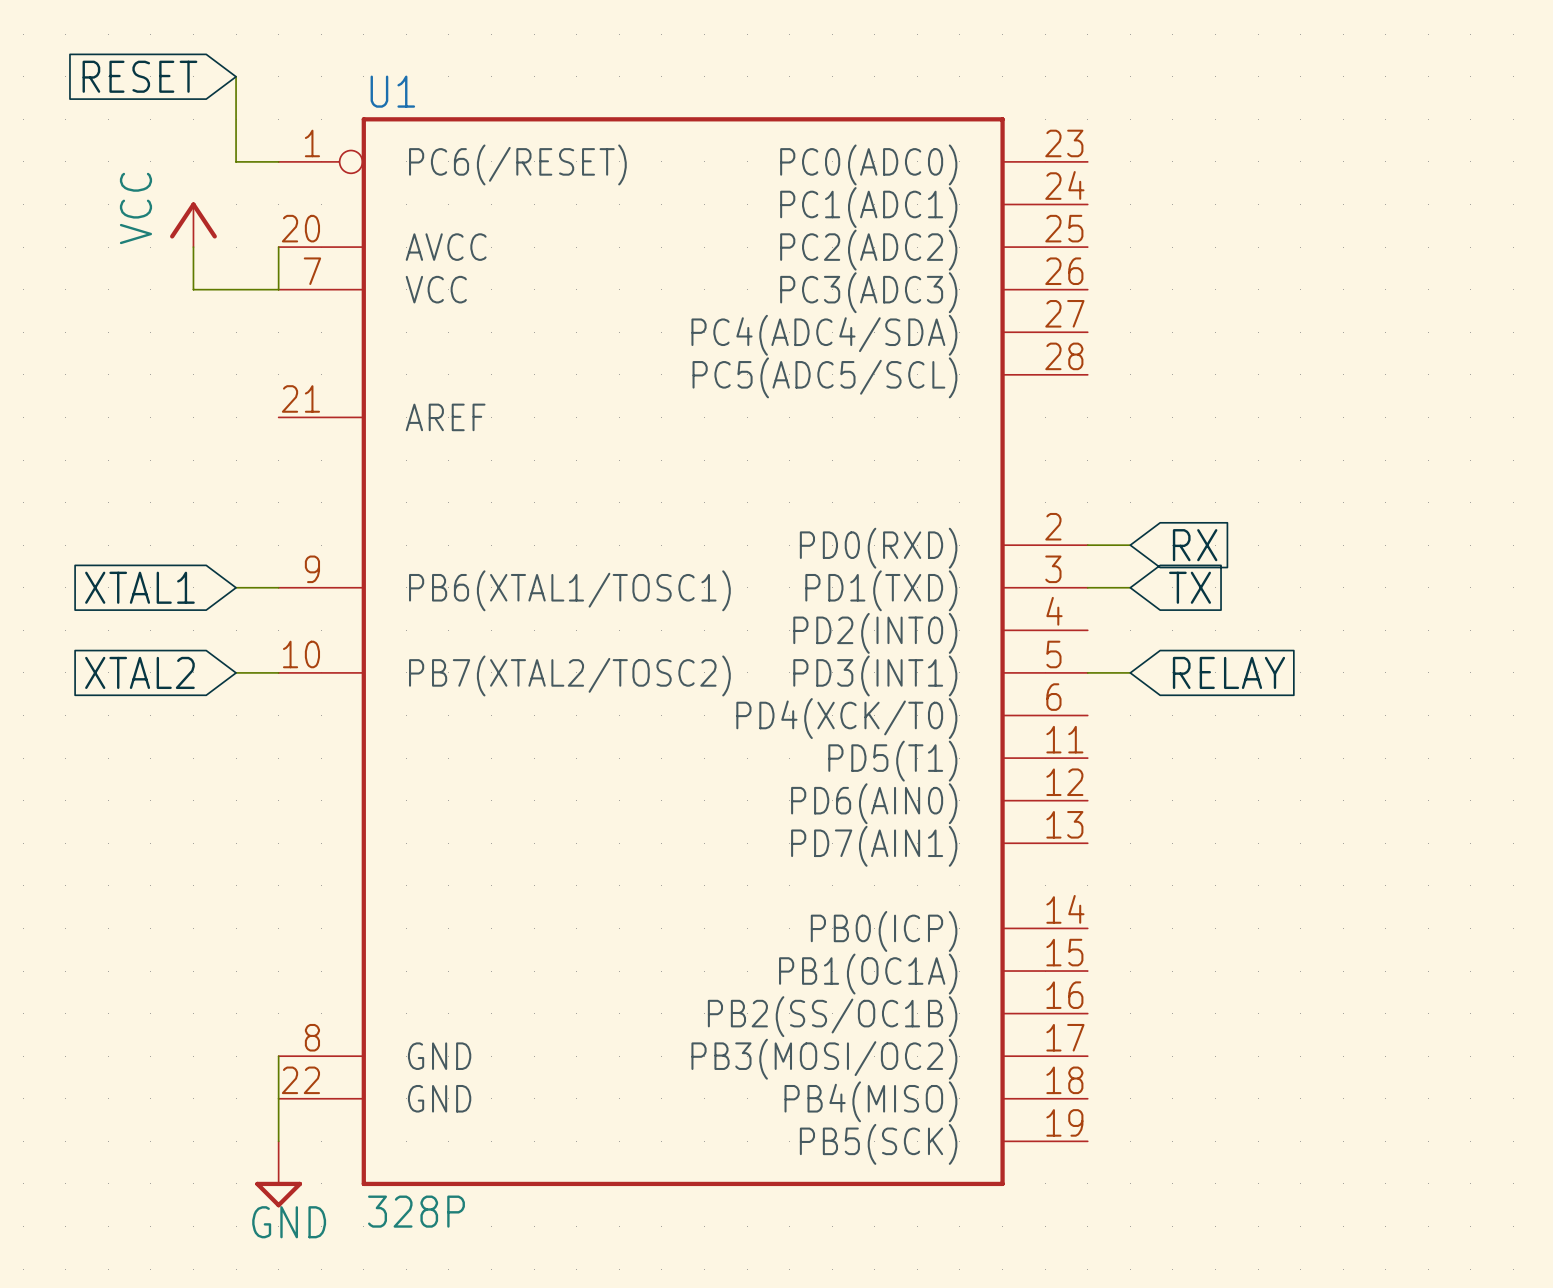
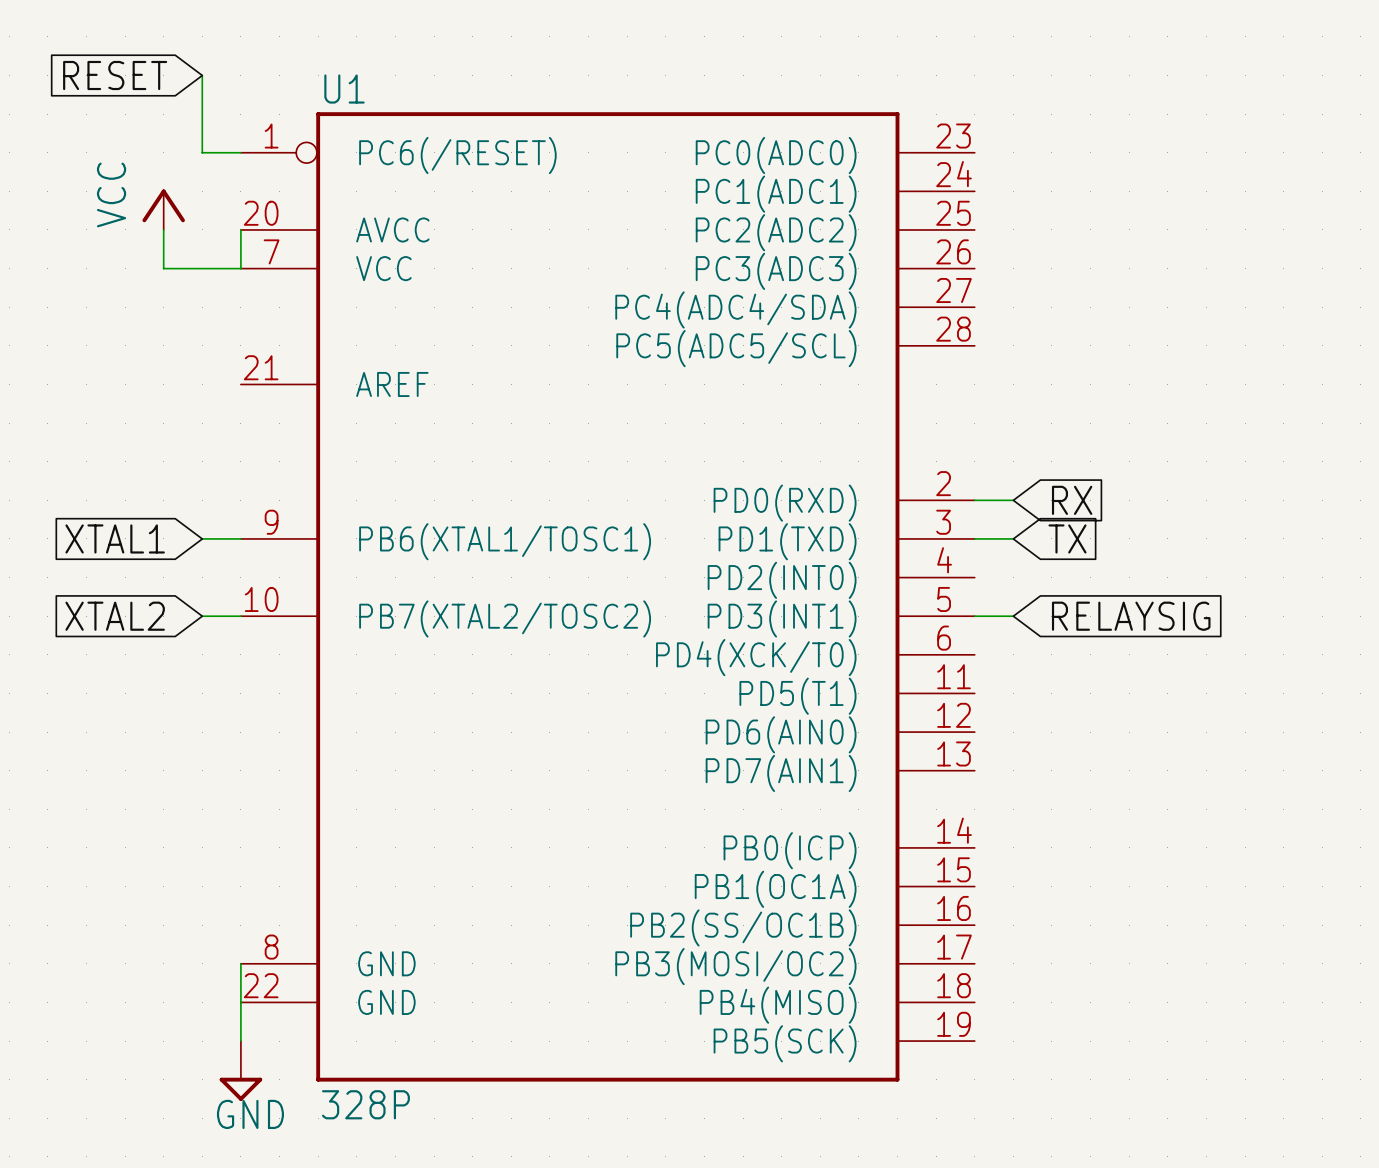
global label: RELAY (1228, 672) -> RELAYSIG (1131, 616)

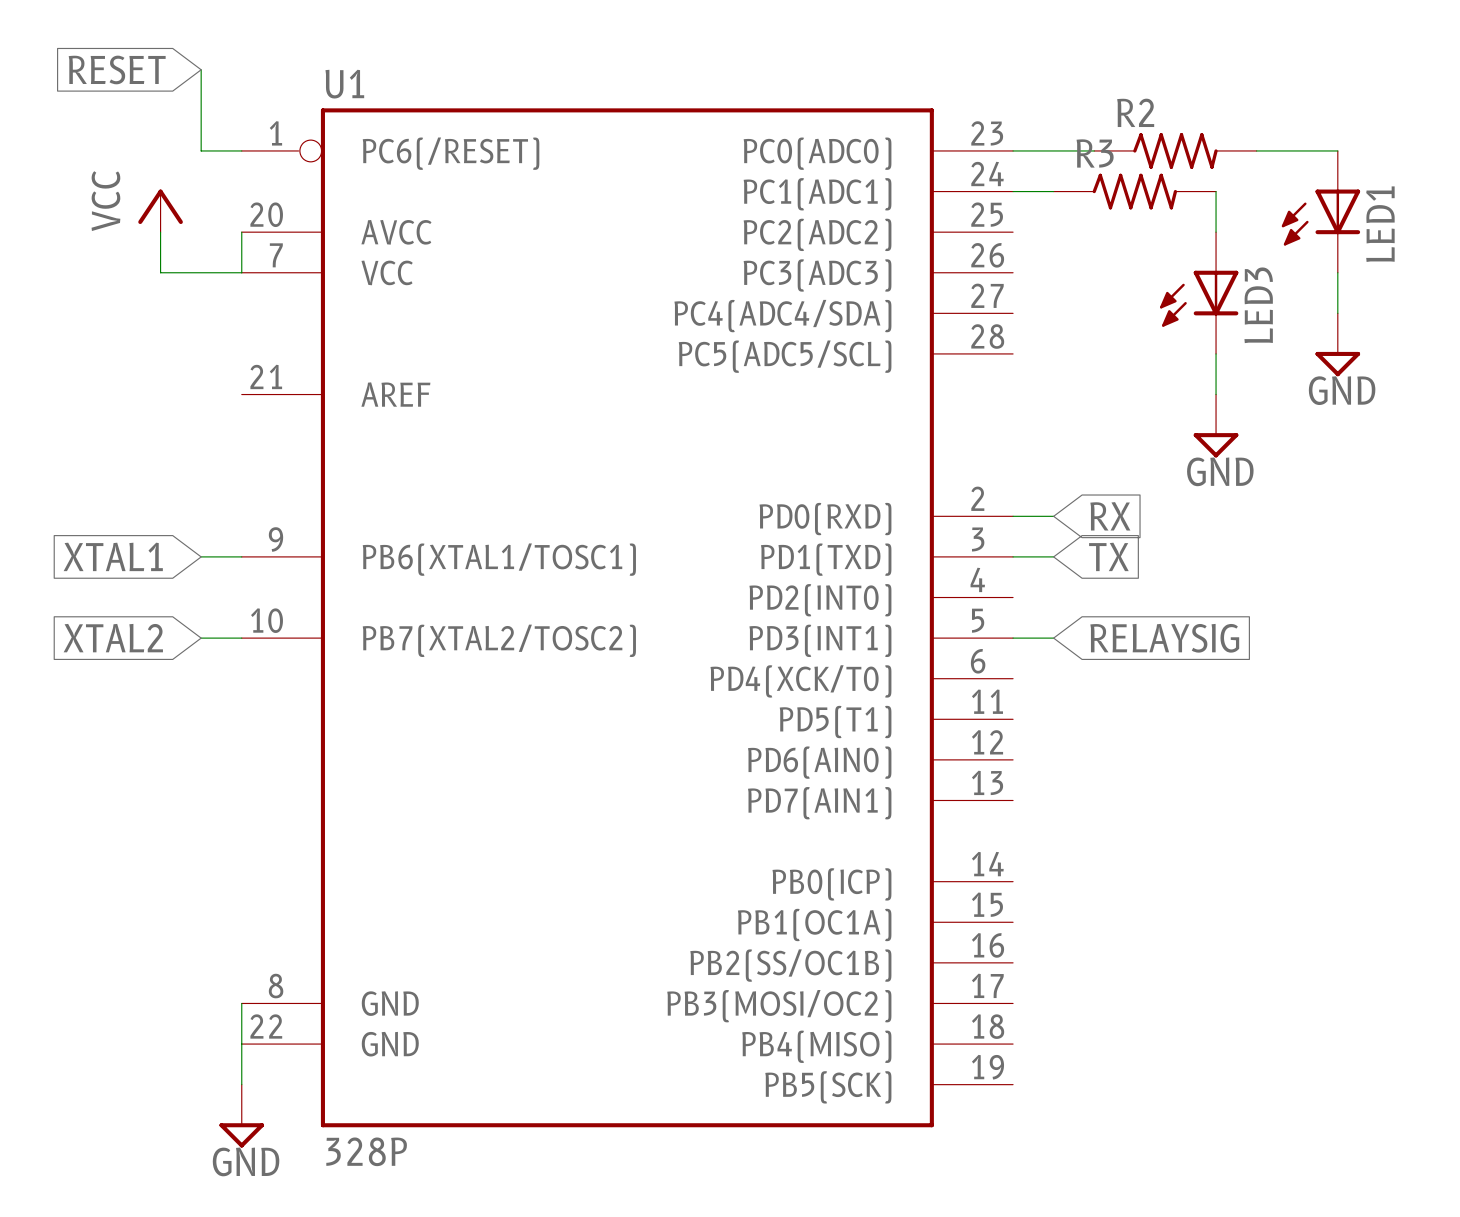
wire: none -> (1013, 150) (1094, 150)
R2: none -> (1175, 150)
wire: none -> (1256, 150) (1337, 150)
wire: none -> (1013, 191) (1053, 191)
R3: none -> (1134, 191)
wire: none -> (1216, 191) (1216, 232)
LED1: none -> (1320, 211)
wire: none -> (1337, 272) (1337, 313)
LED3: none -> (1199, 293)
power symbol: none -> GND (1337, 344)
wire: none -> (1216, 353) (1216, 394)
power symbol: none -> GND (1216, 426)

